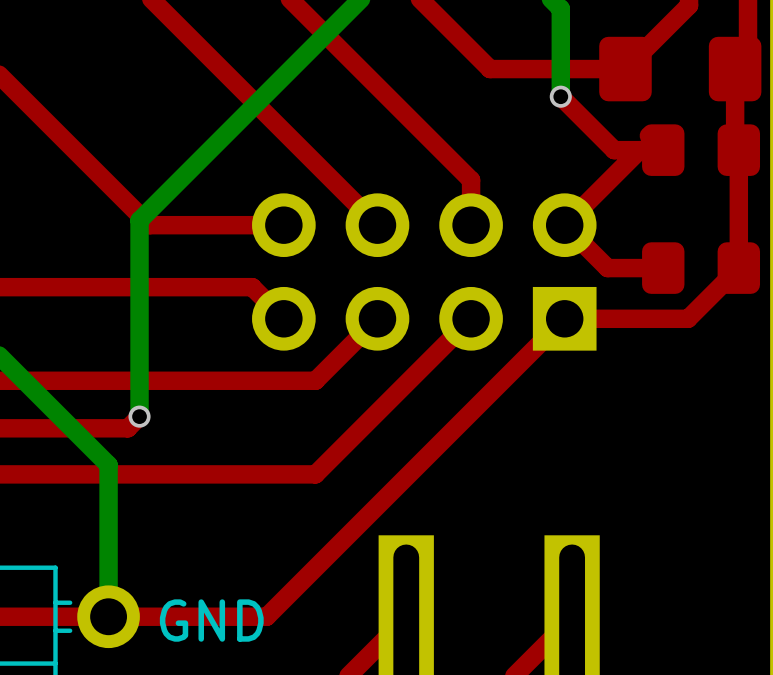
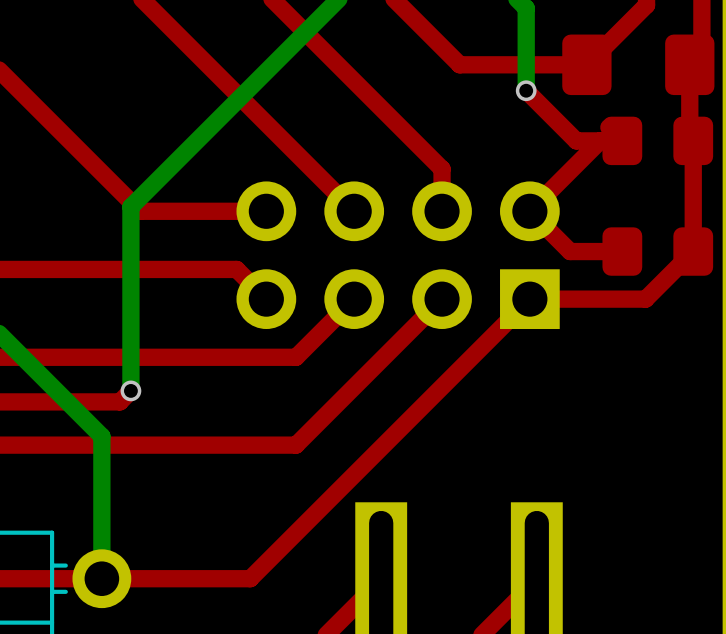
text: GND (211, 620) -> none

